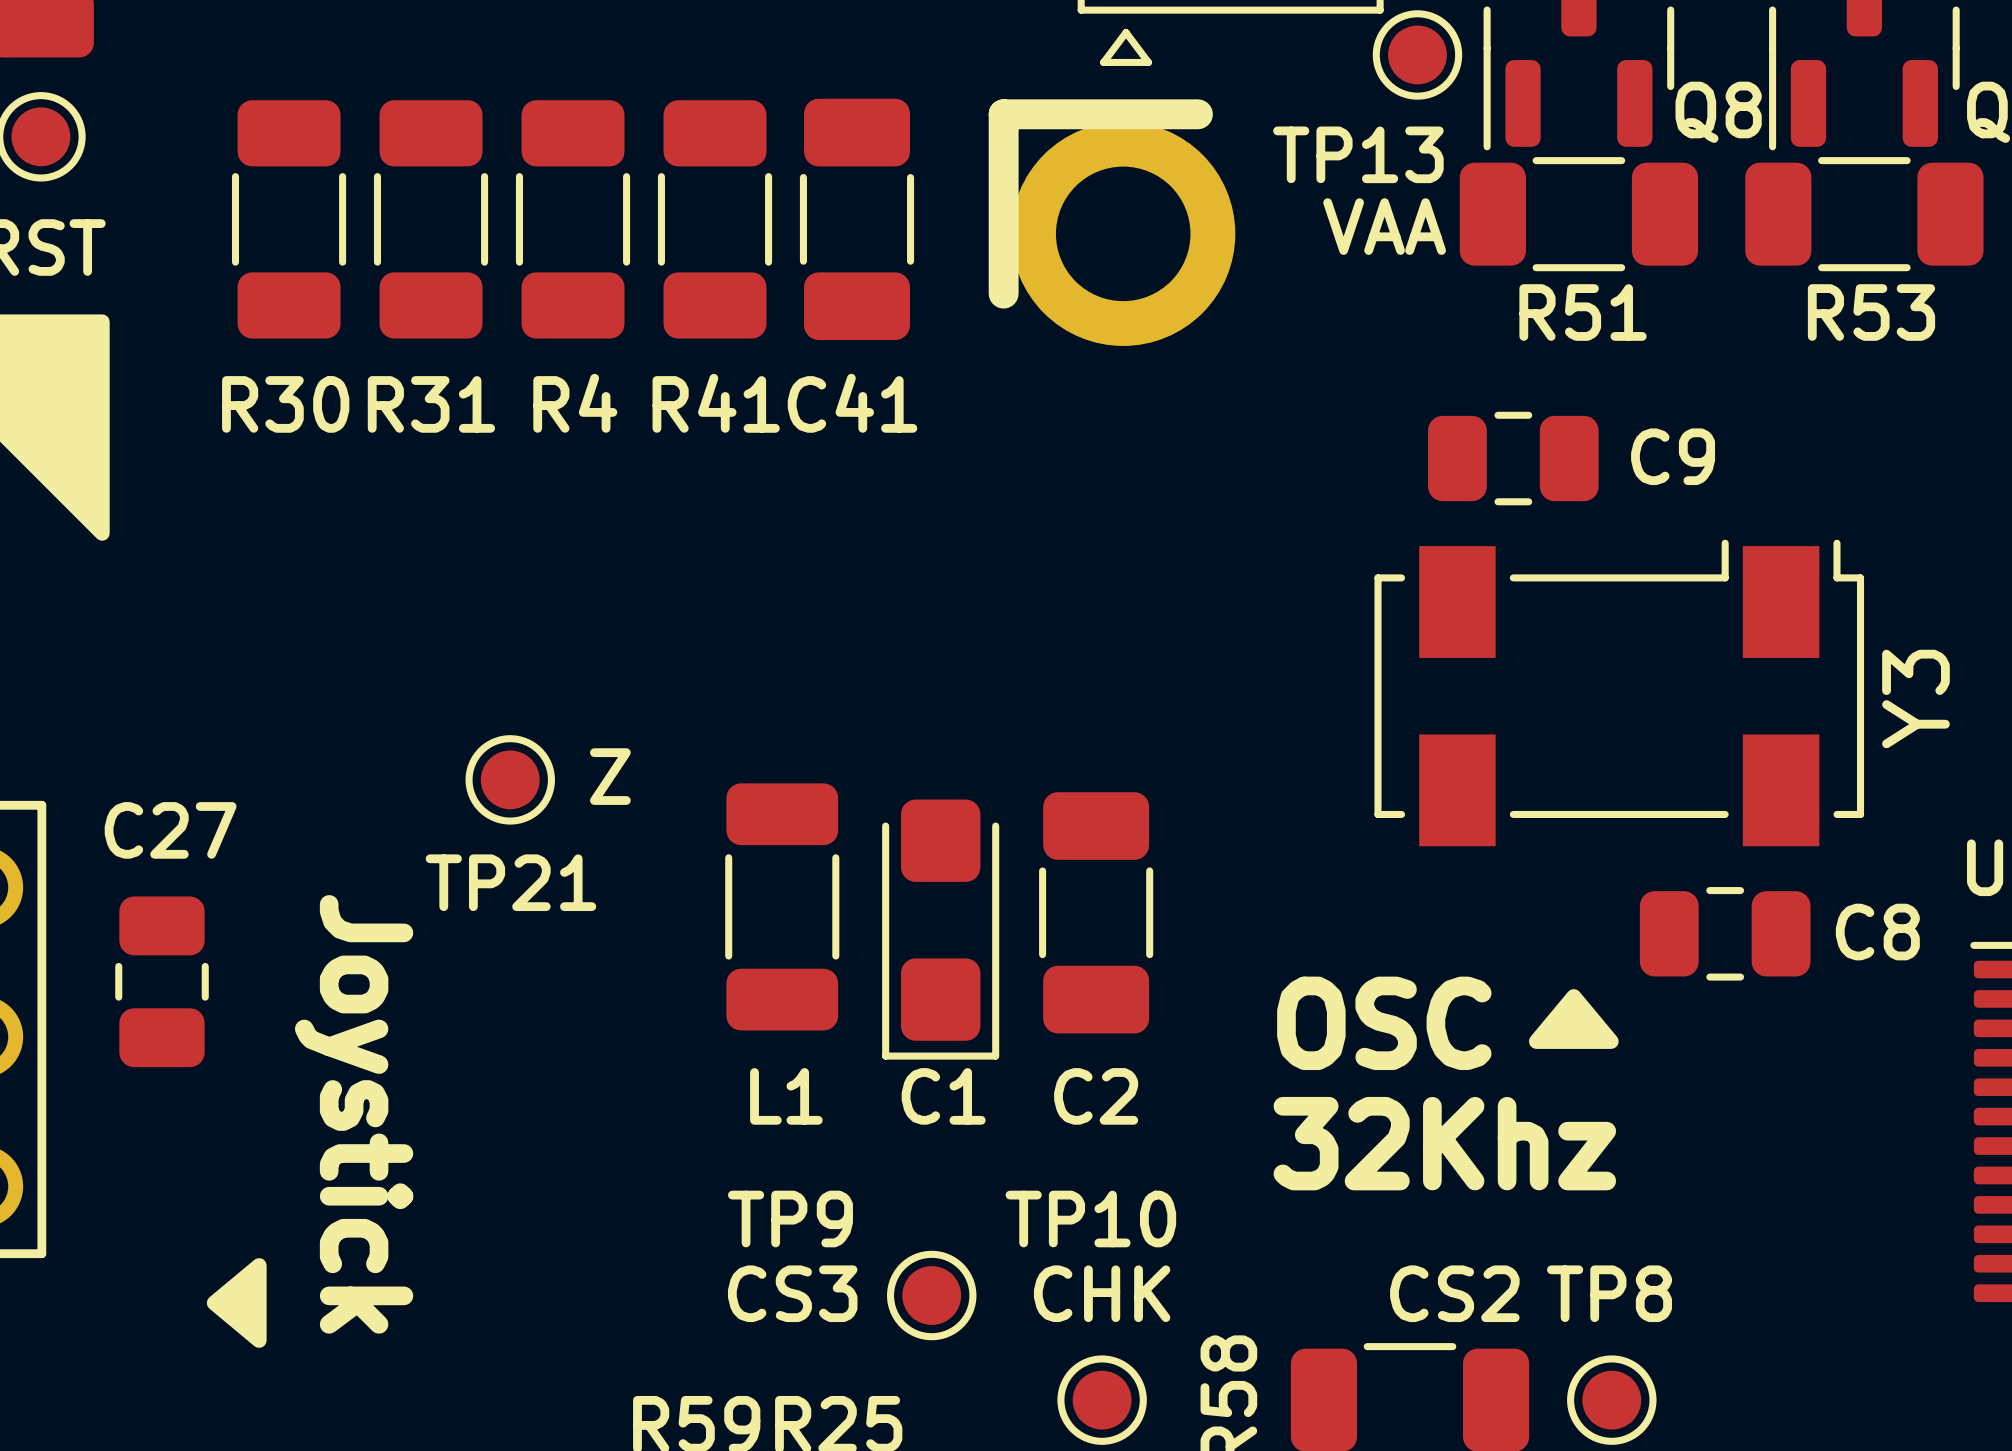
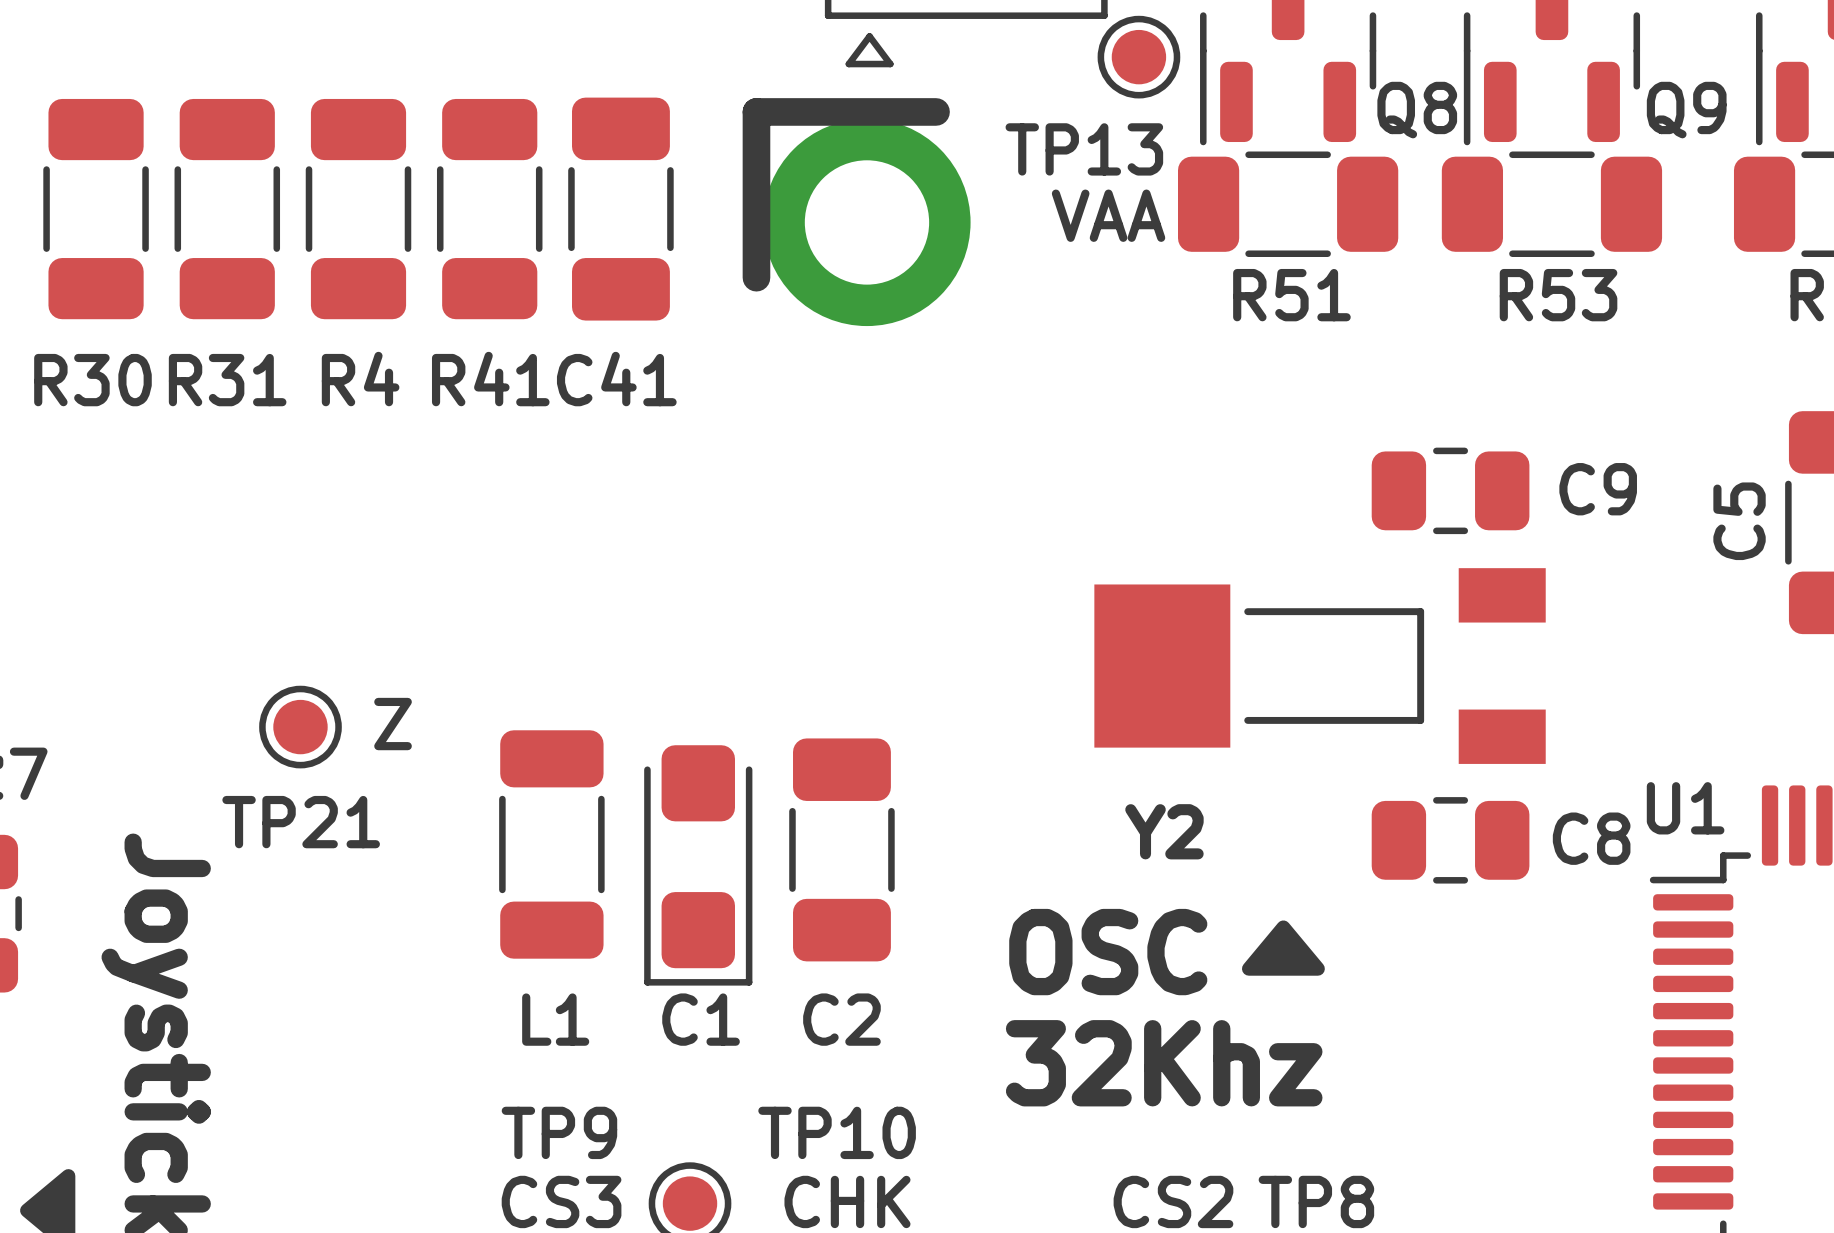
C9 position: (1513, 458) -> (1450, 490)
Y3: (1619, 692) -> none
Y2: none -> (1320, 666)
C8 position: (1725, 933) -> (1450, 840)

